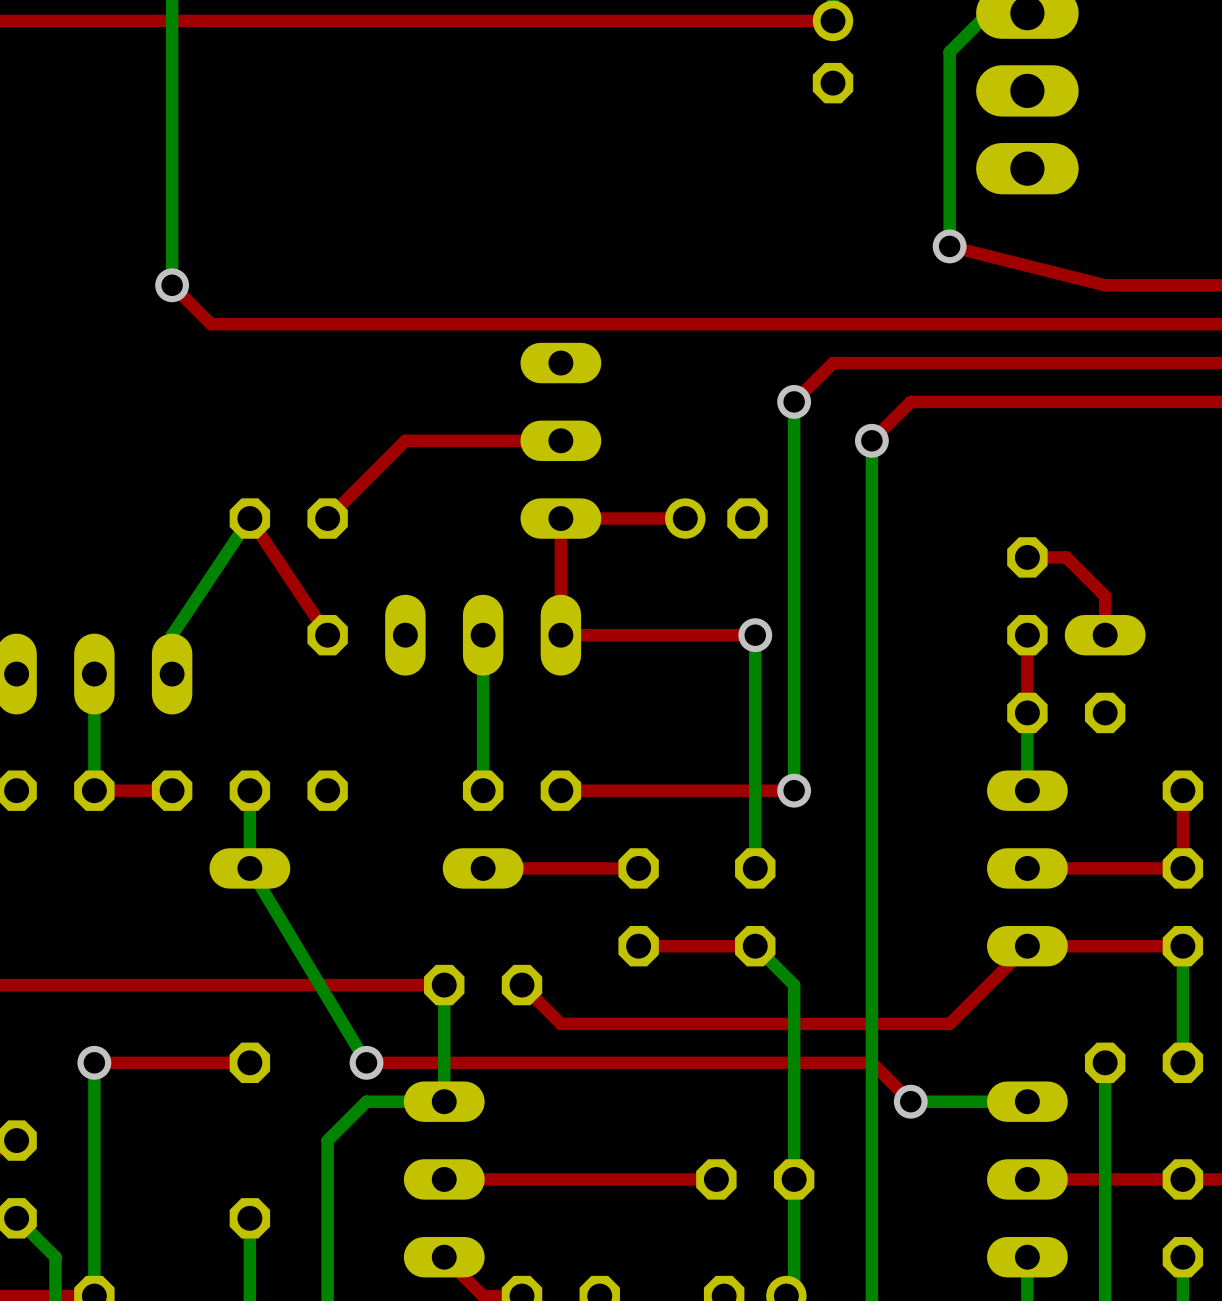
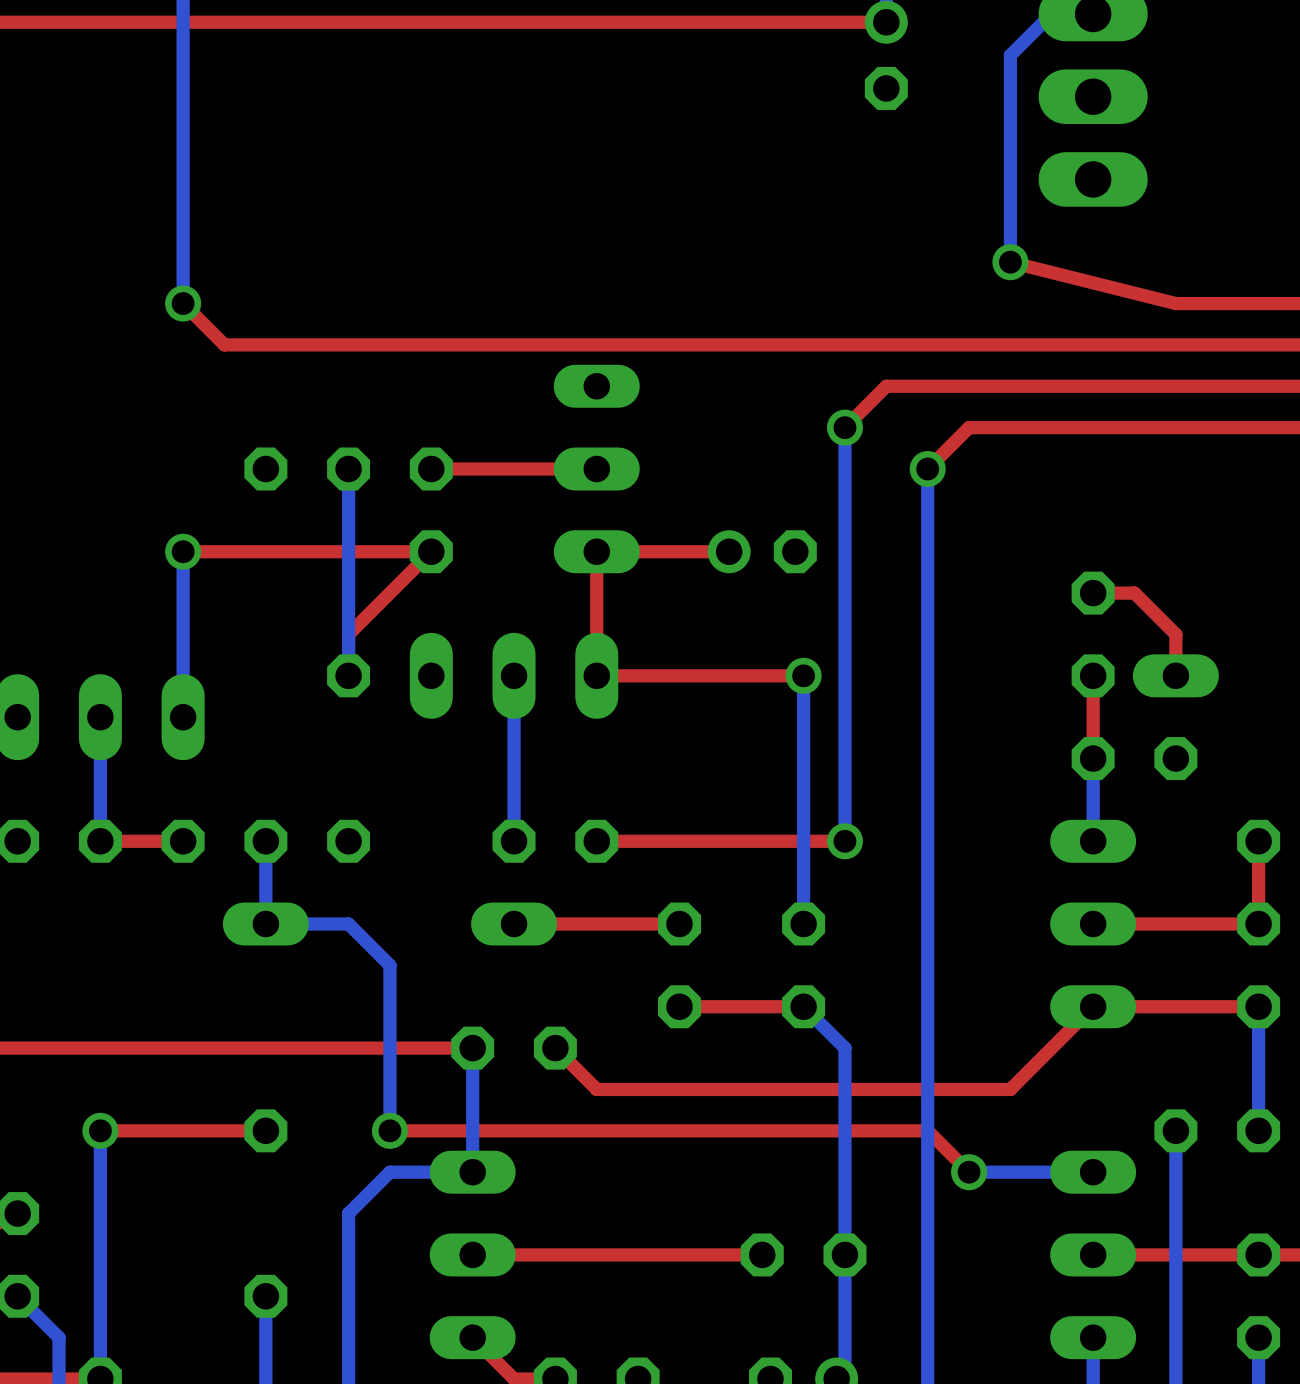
part: none -> (307, 469)
bottom track: none -> (348, 469) (348, 675)
top track: (405, 440) (327, 518) -> none
part: none -> (431, 510)
via: none -> (183, 551)
top track: (249, 518) (327, 635) -> (183, 551) (431, 551) (348, 634) (348, 675)
bottom track: (249, 518) (172, 635) -> (183, 551) (183, 675)
part: (288, 518) -> none
bottom track: (249, 868) (366, 1062) -> (265, 924) (348, 924) (389, 965) (389, 1130)

